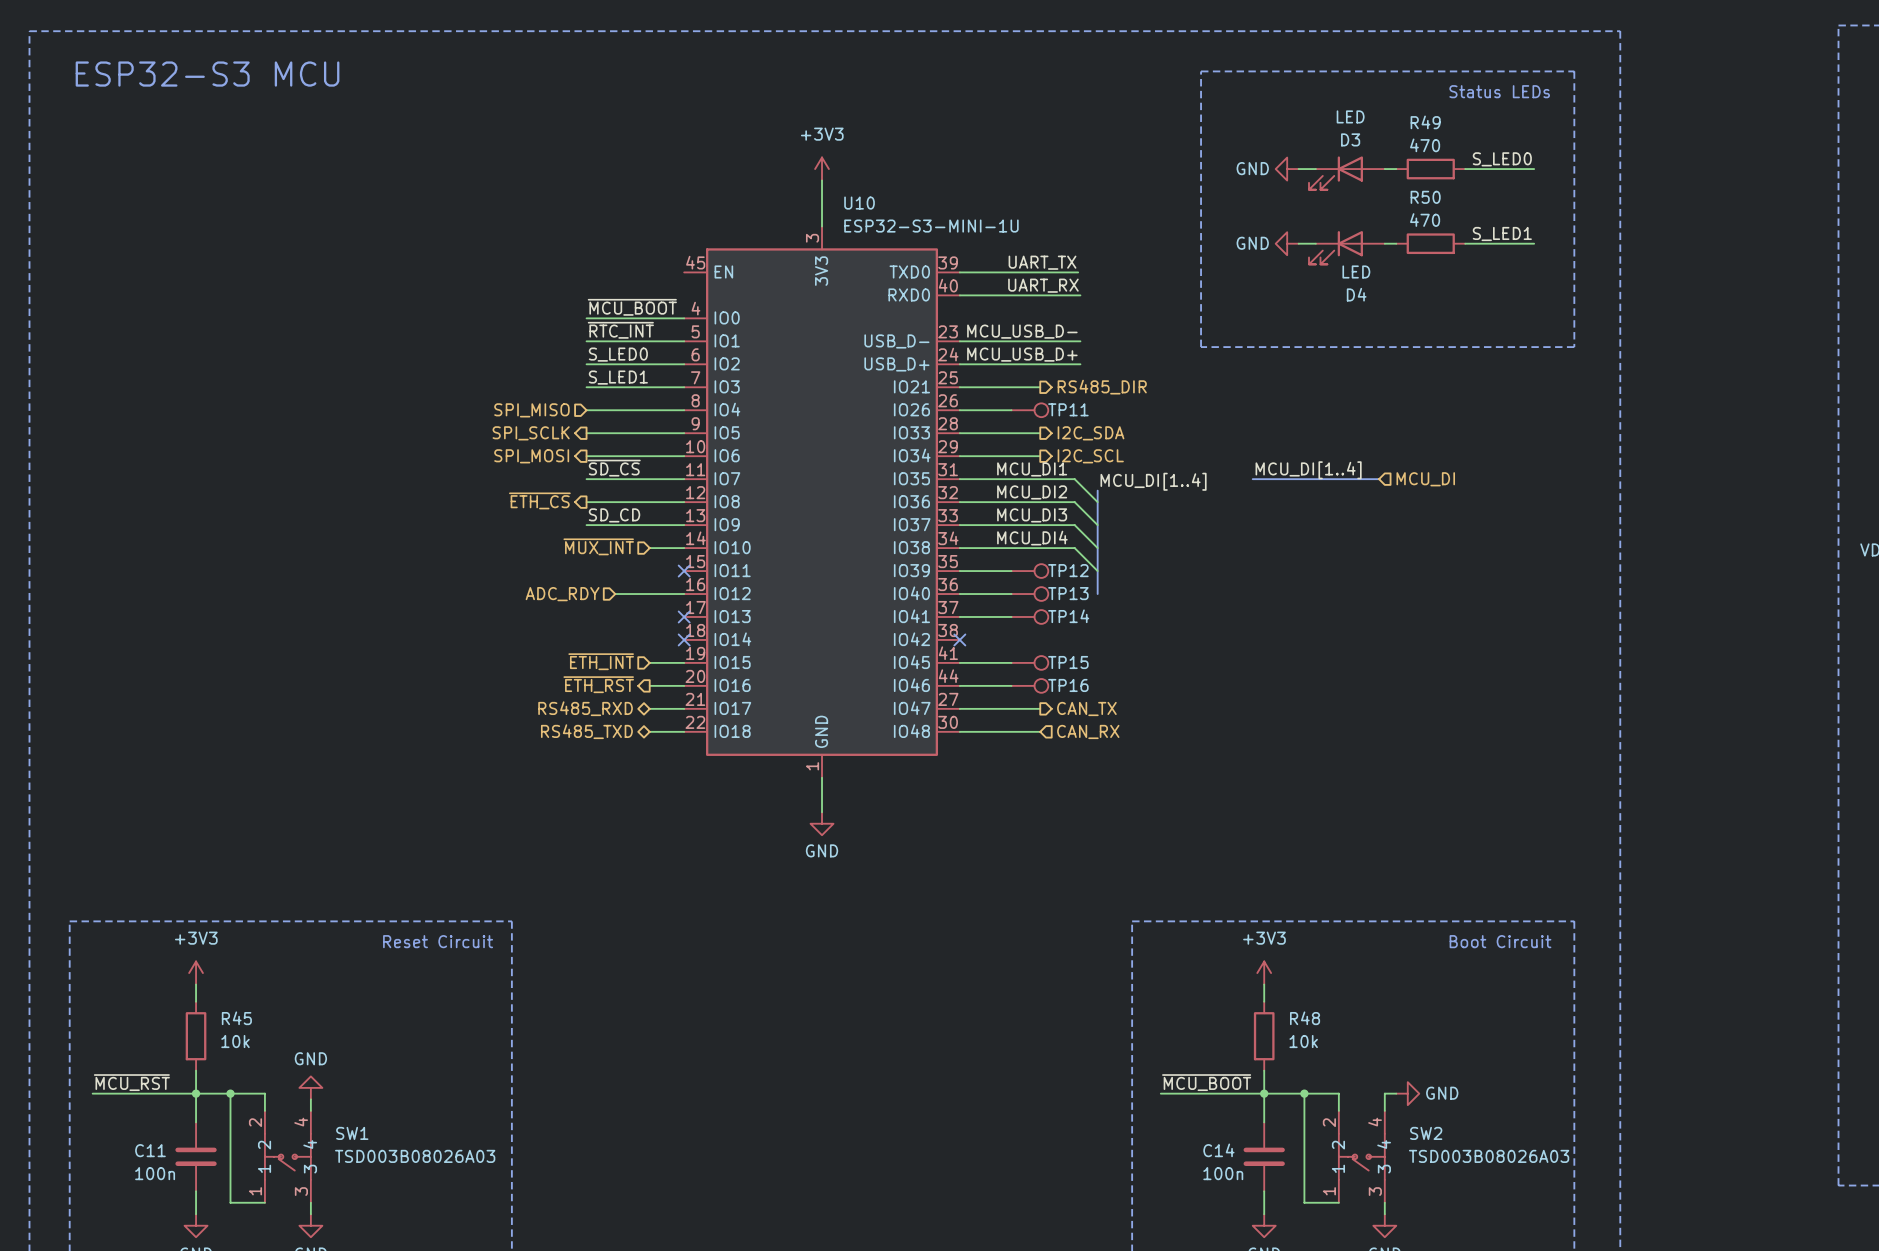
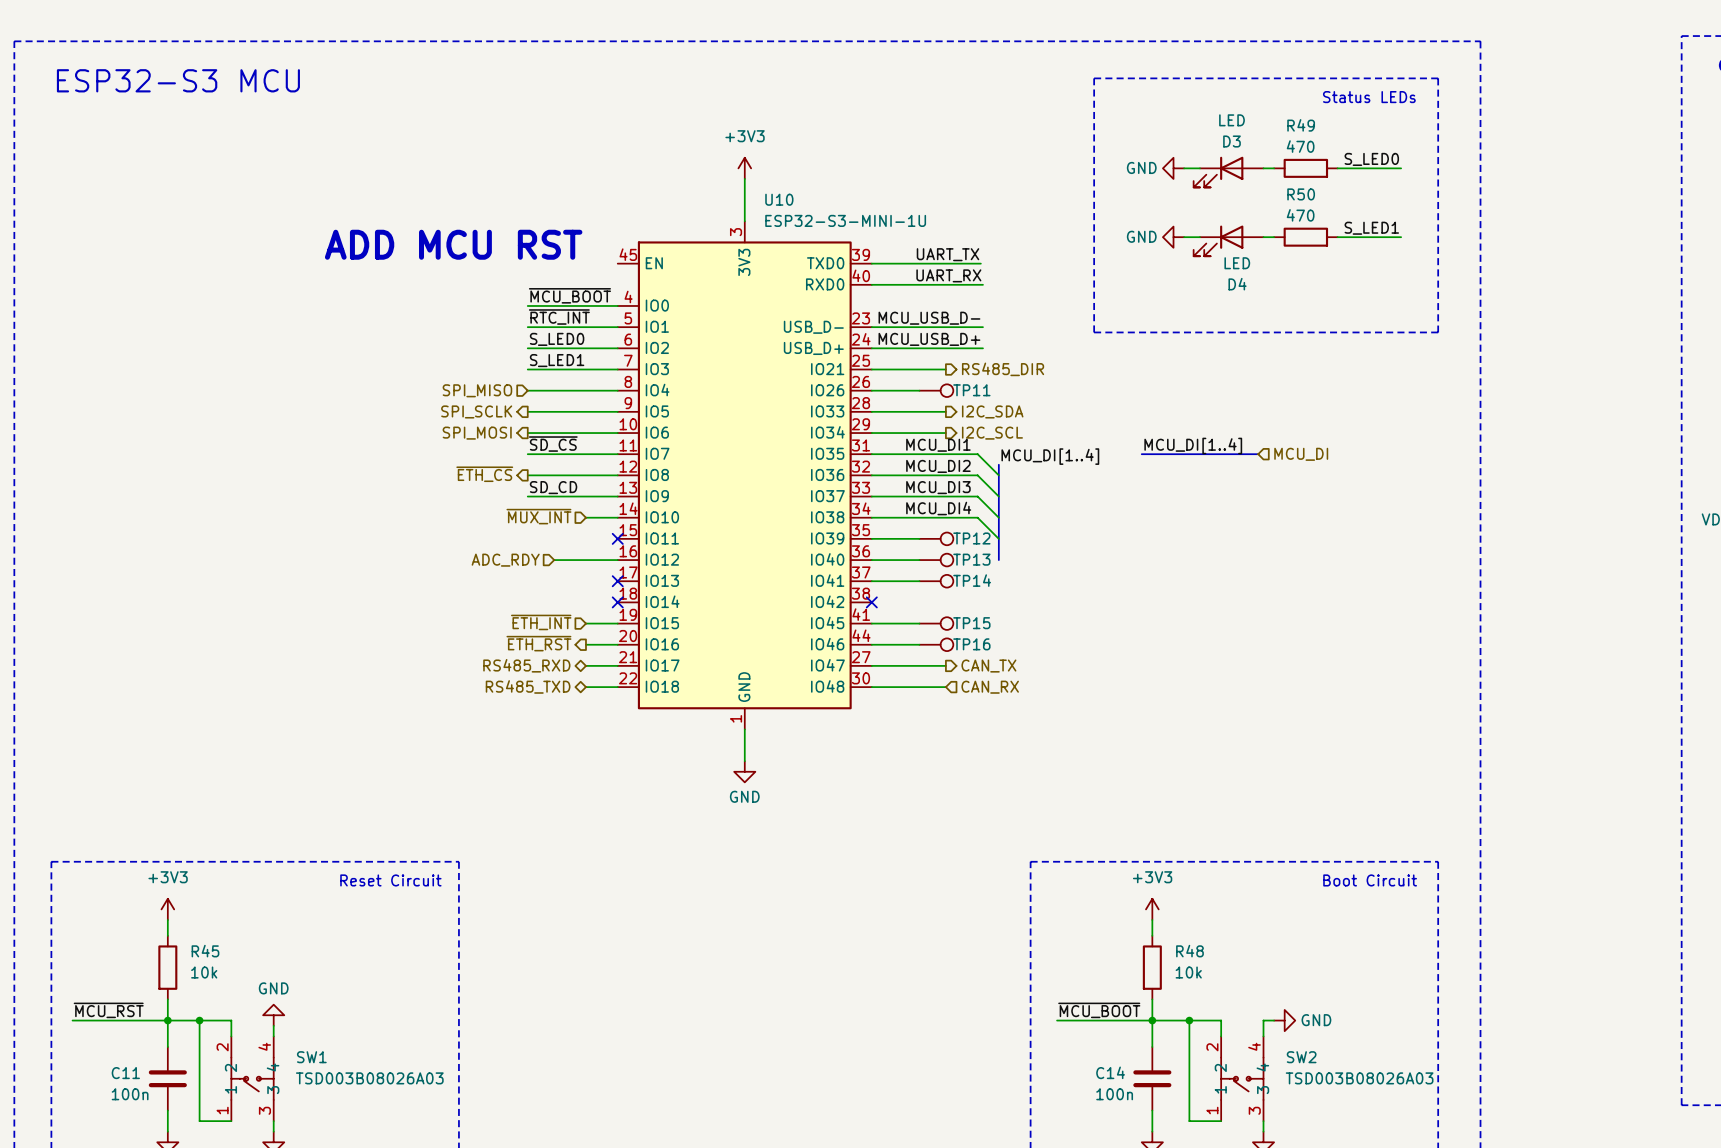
text: none -> ADD MCU RST (453, 244)

